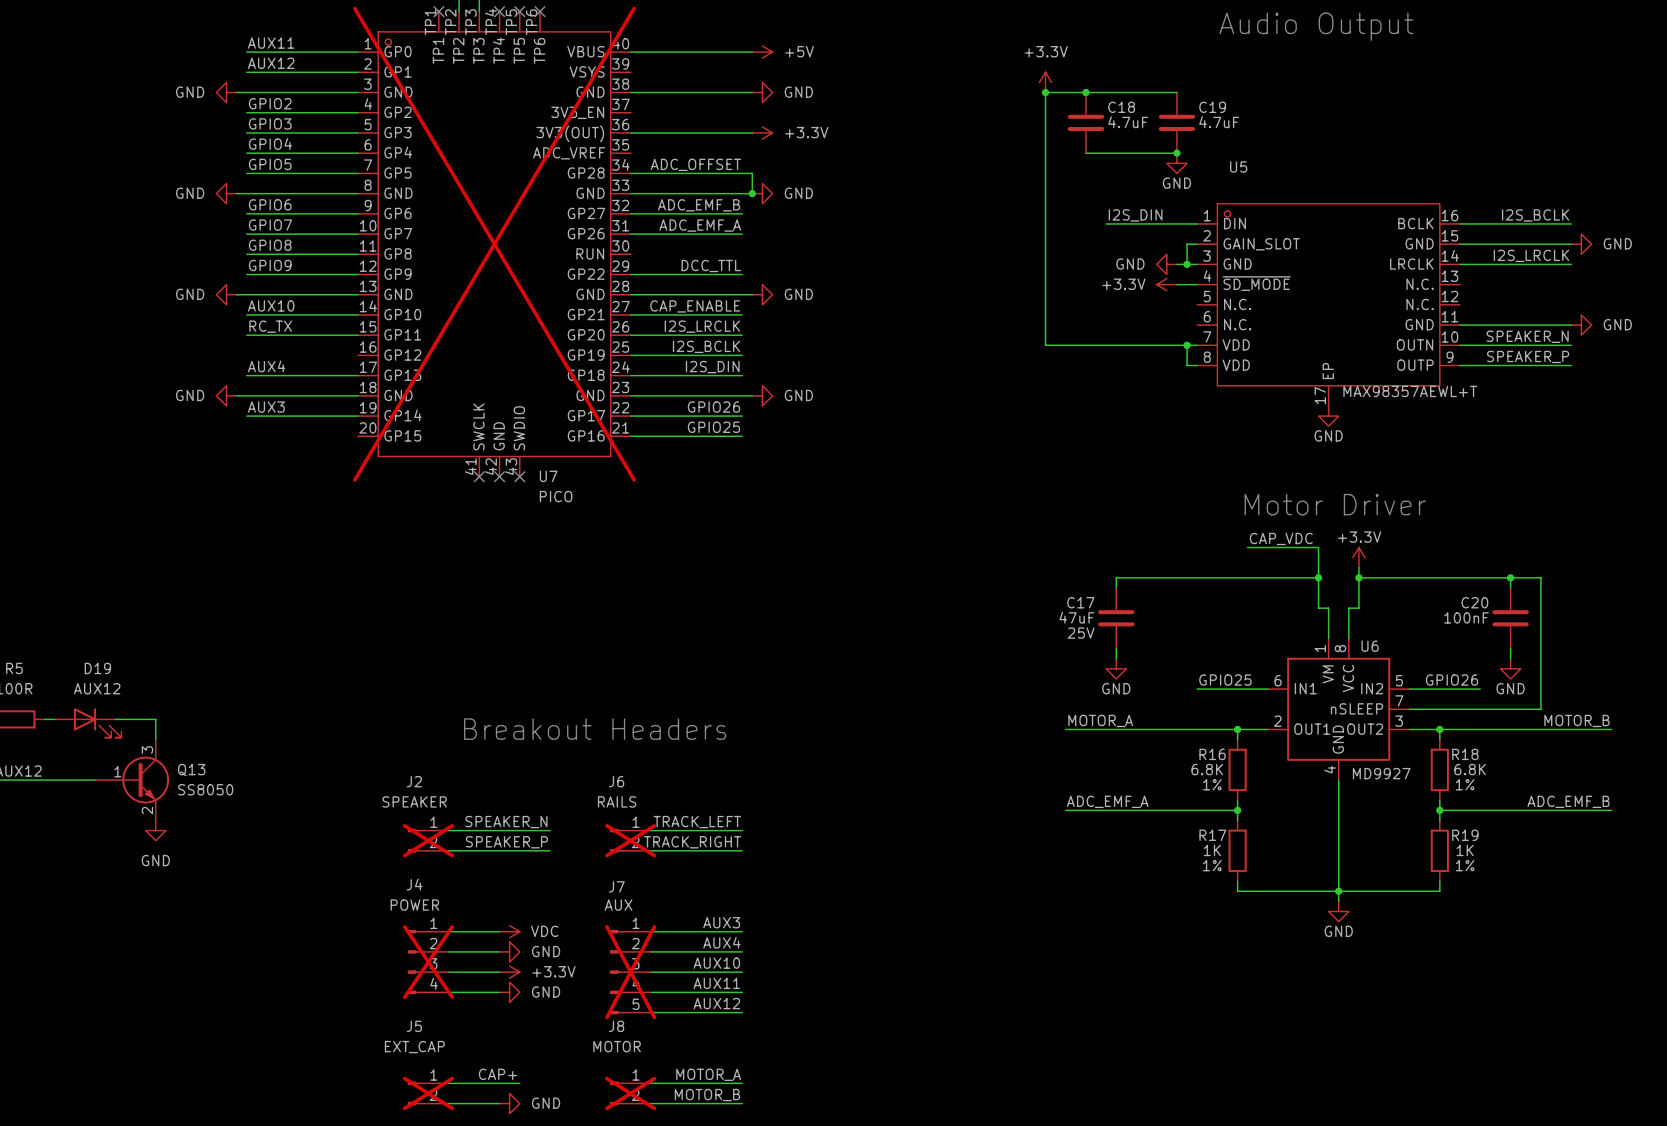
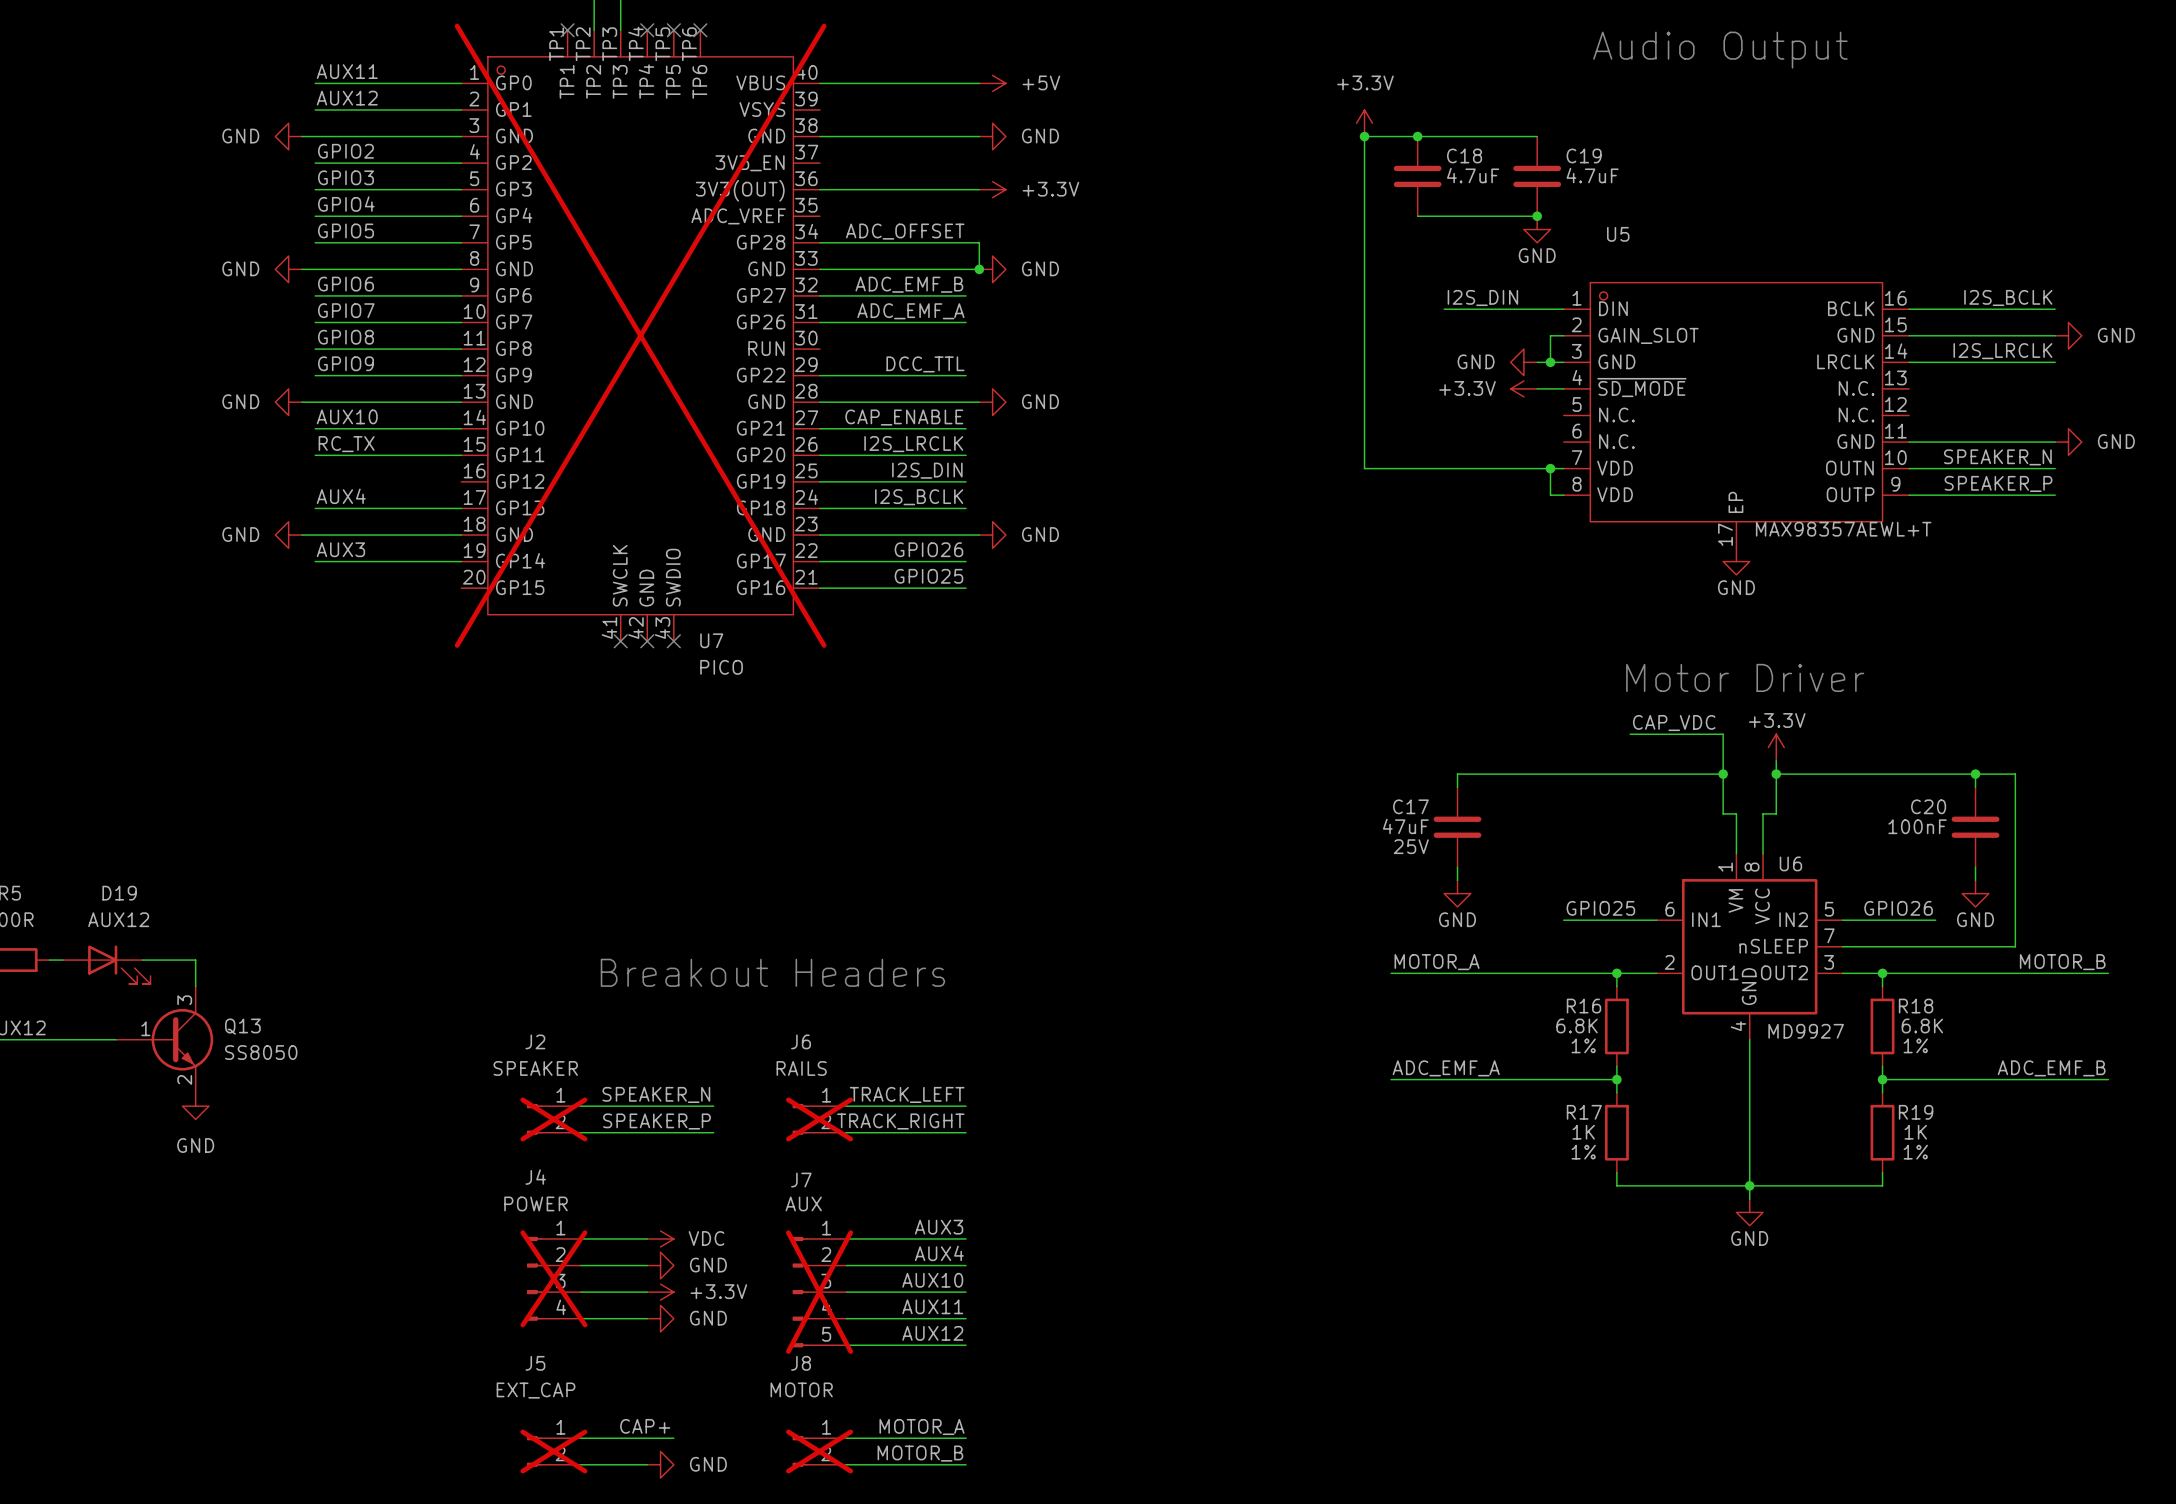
label: I2S_BCLK (706, 346) -> I2S_DIN (927, 470)
label: I2S_DIN (712, 367) -> I2S_BCLK (919, 497)

